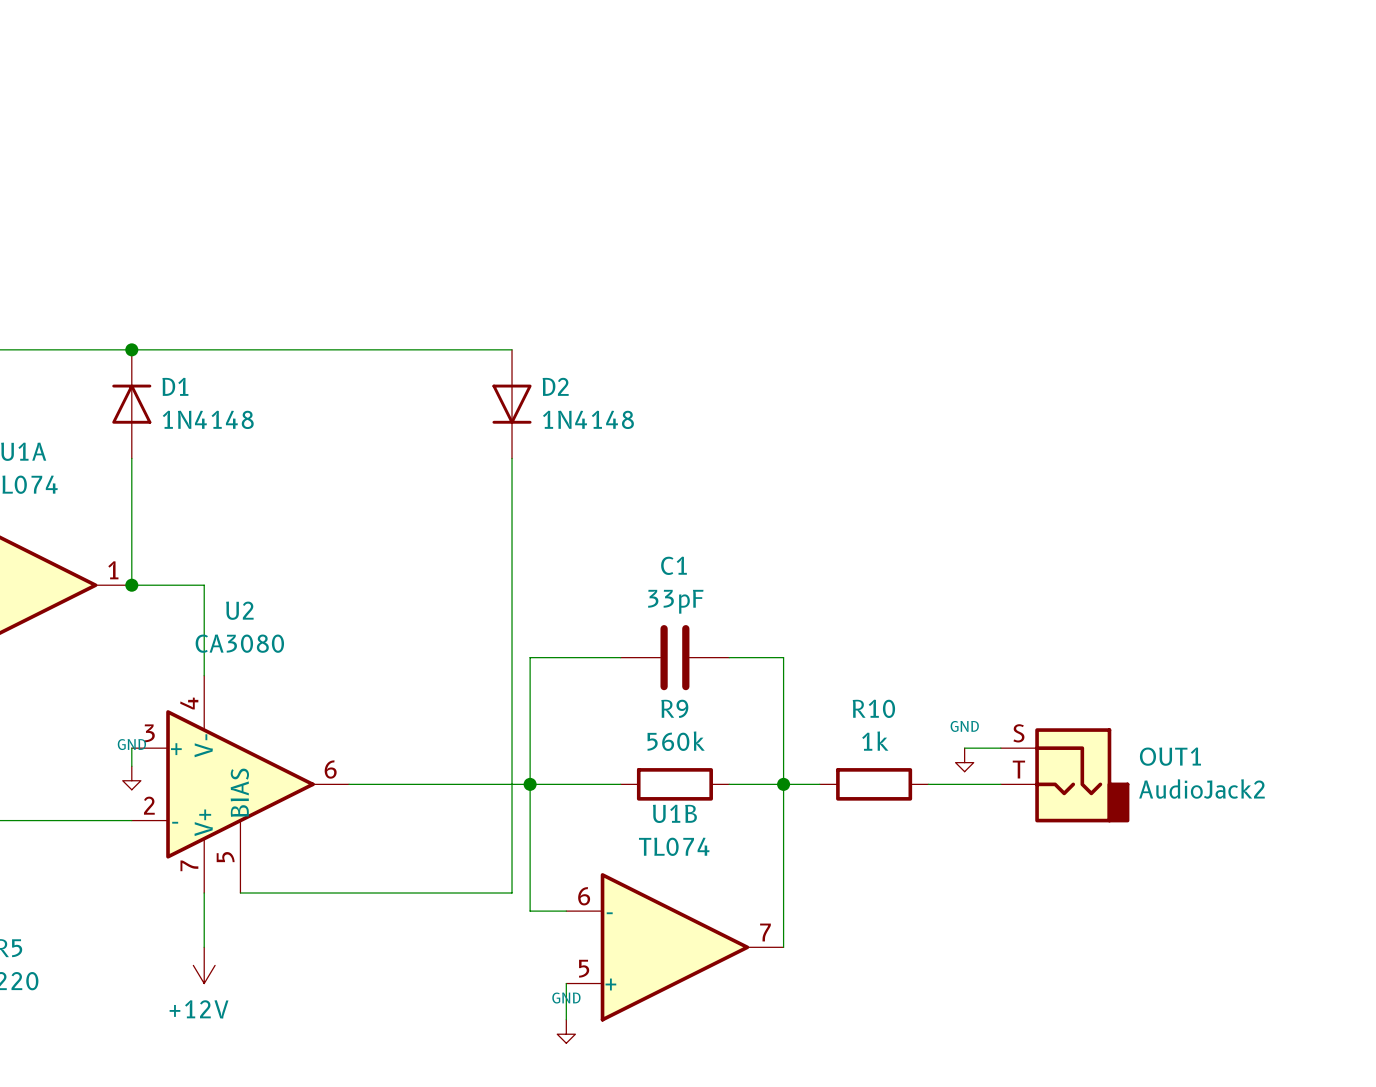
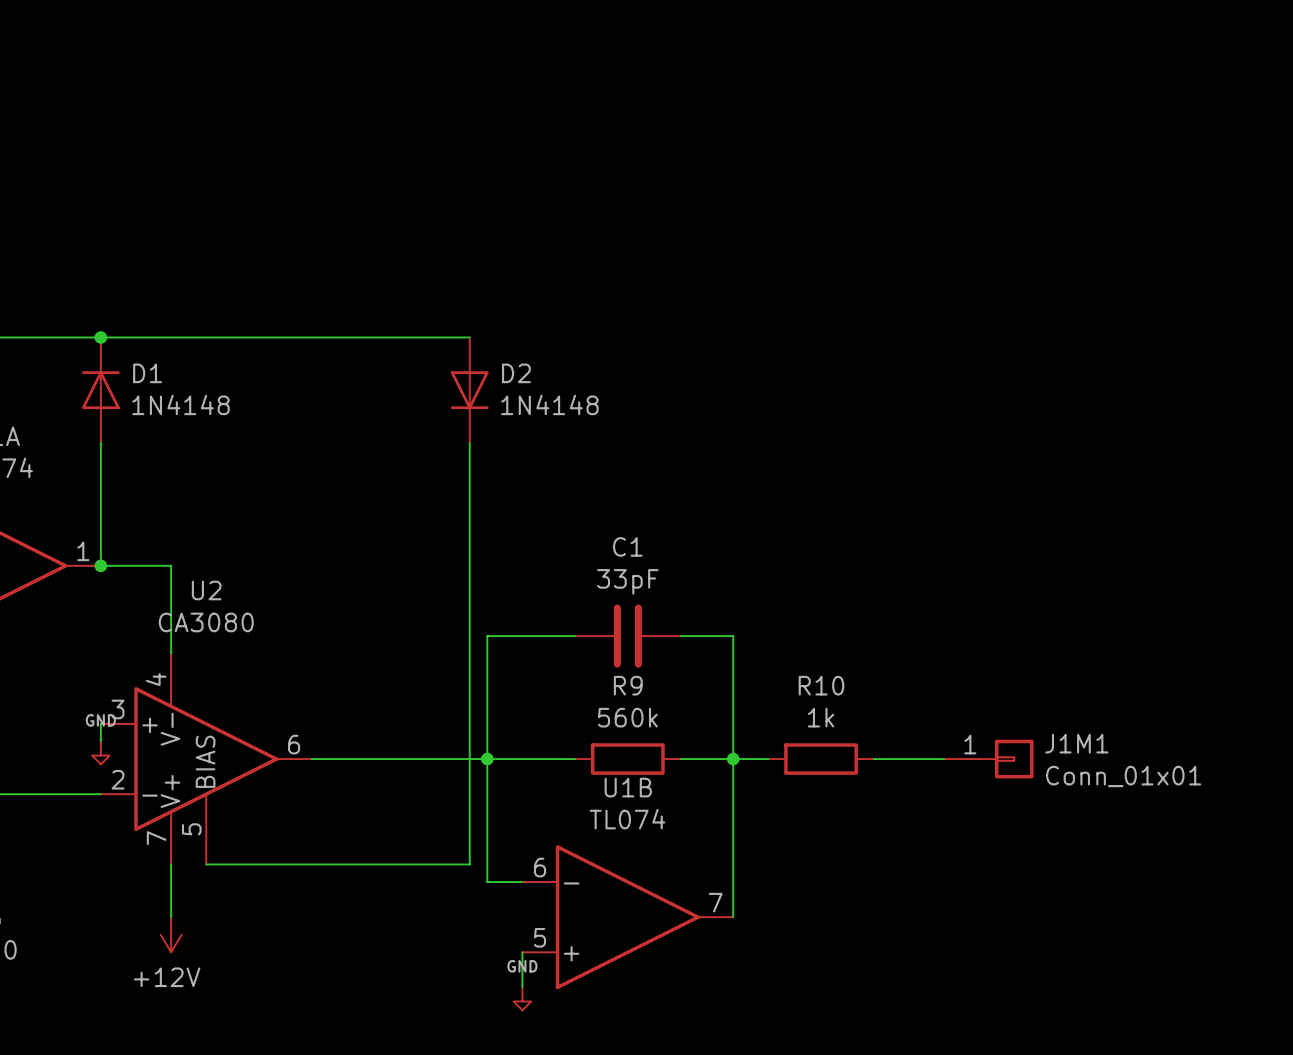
wire: (964, 748) (1000, 748) -> none
power symbol: GND (964, 759) -> none
OUT1: AudioJack2 (1065, 775) -> none
J1M1: none -> Conn_01x01 (988, 759)

